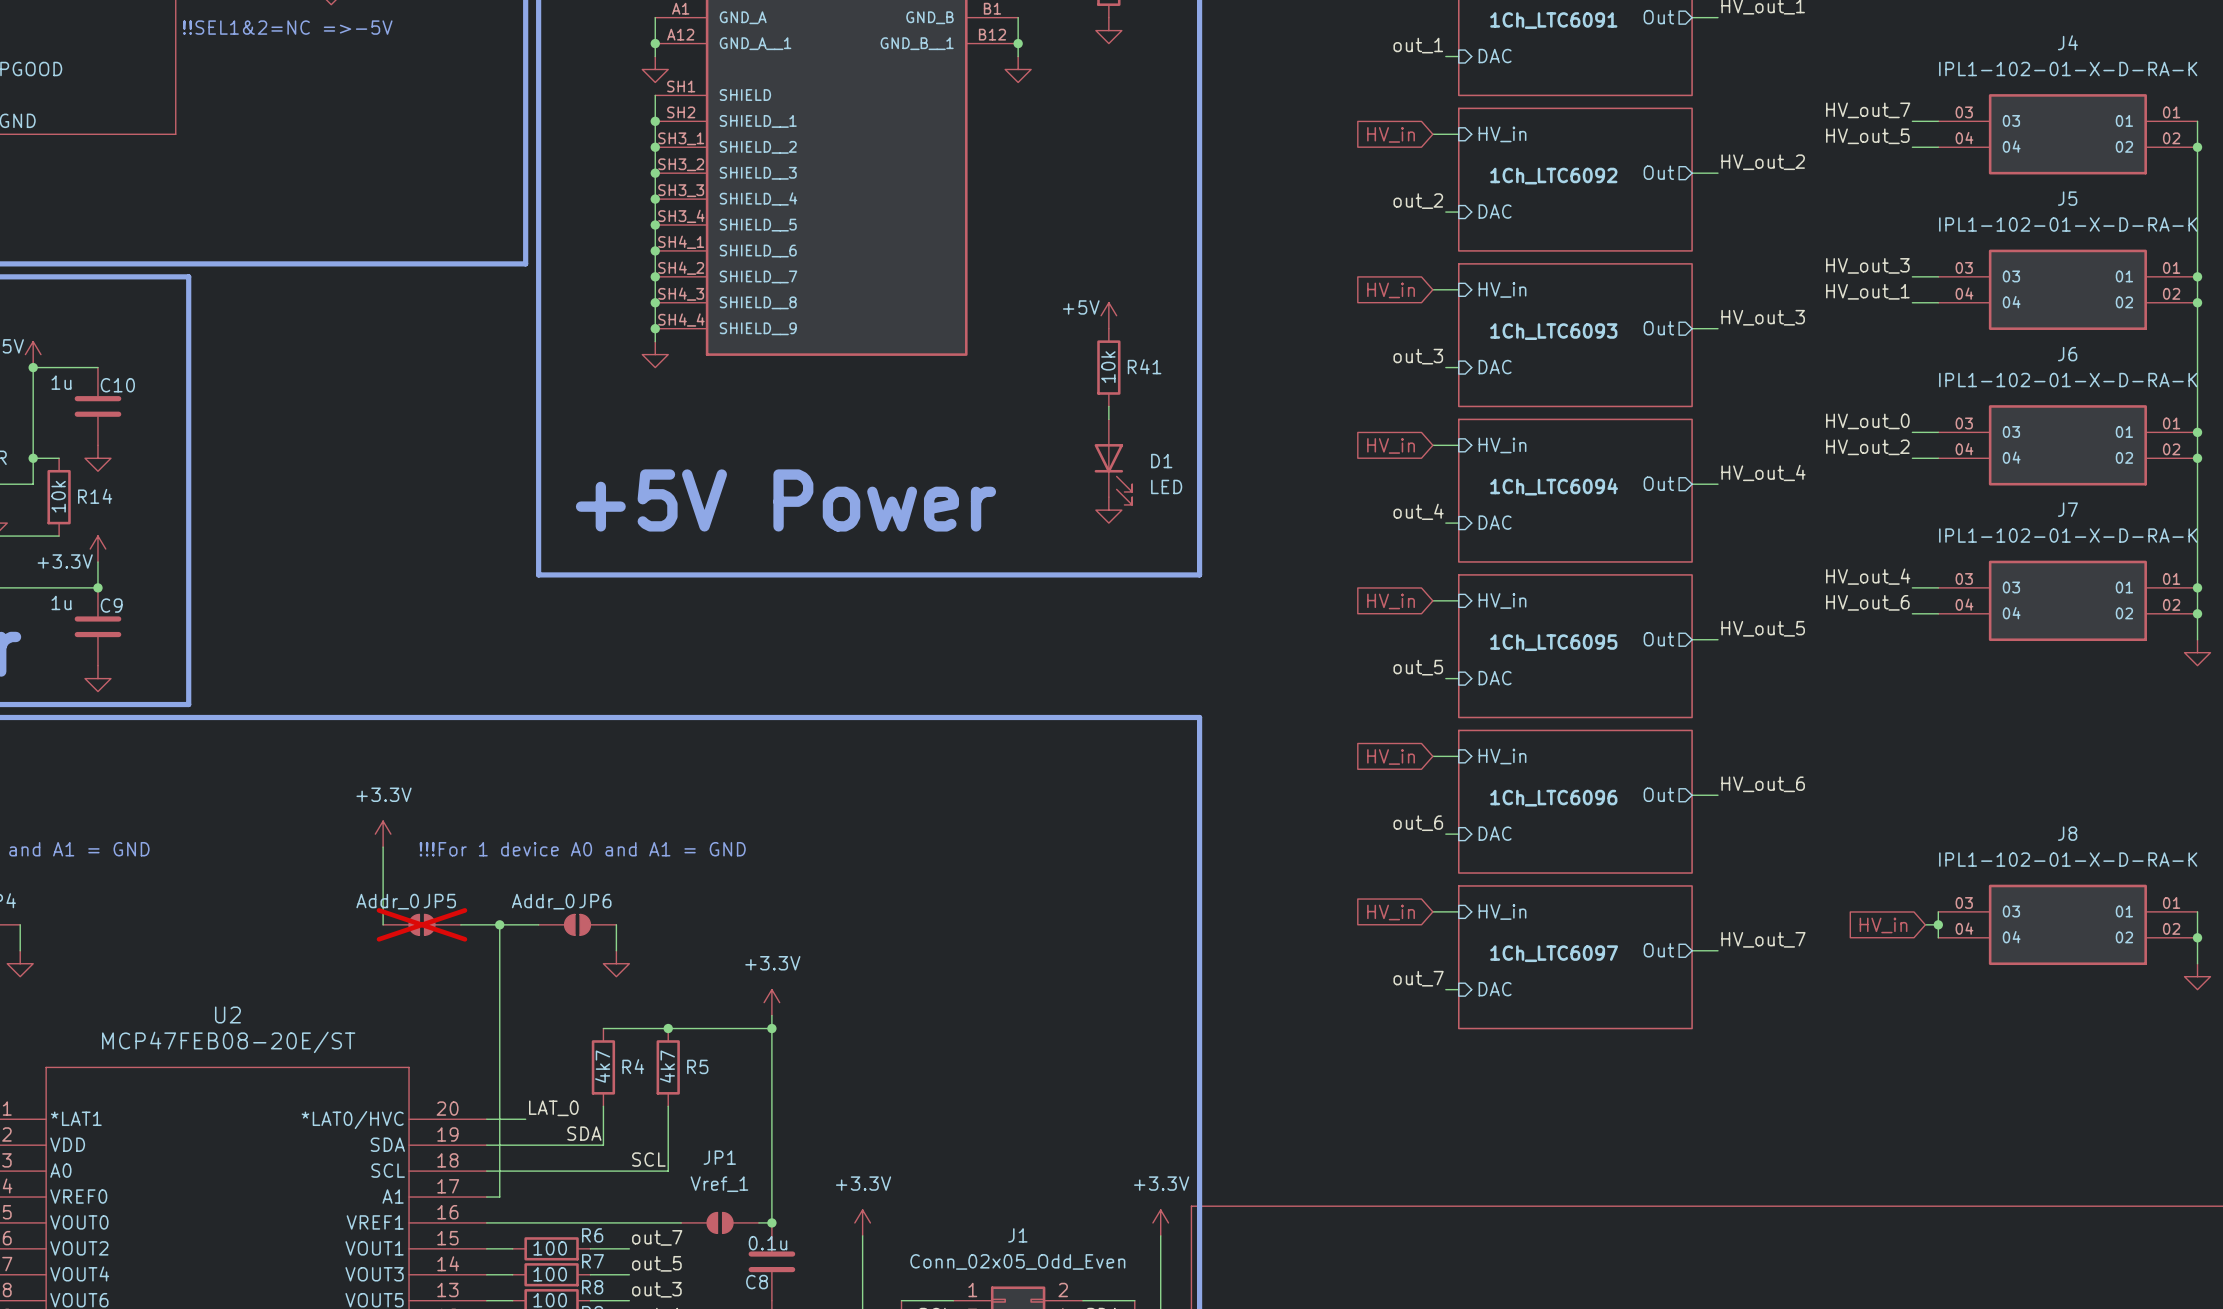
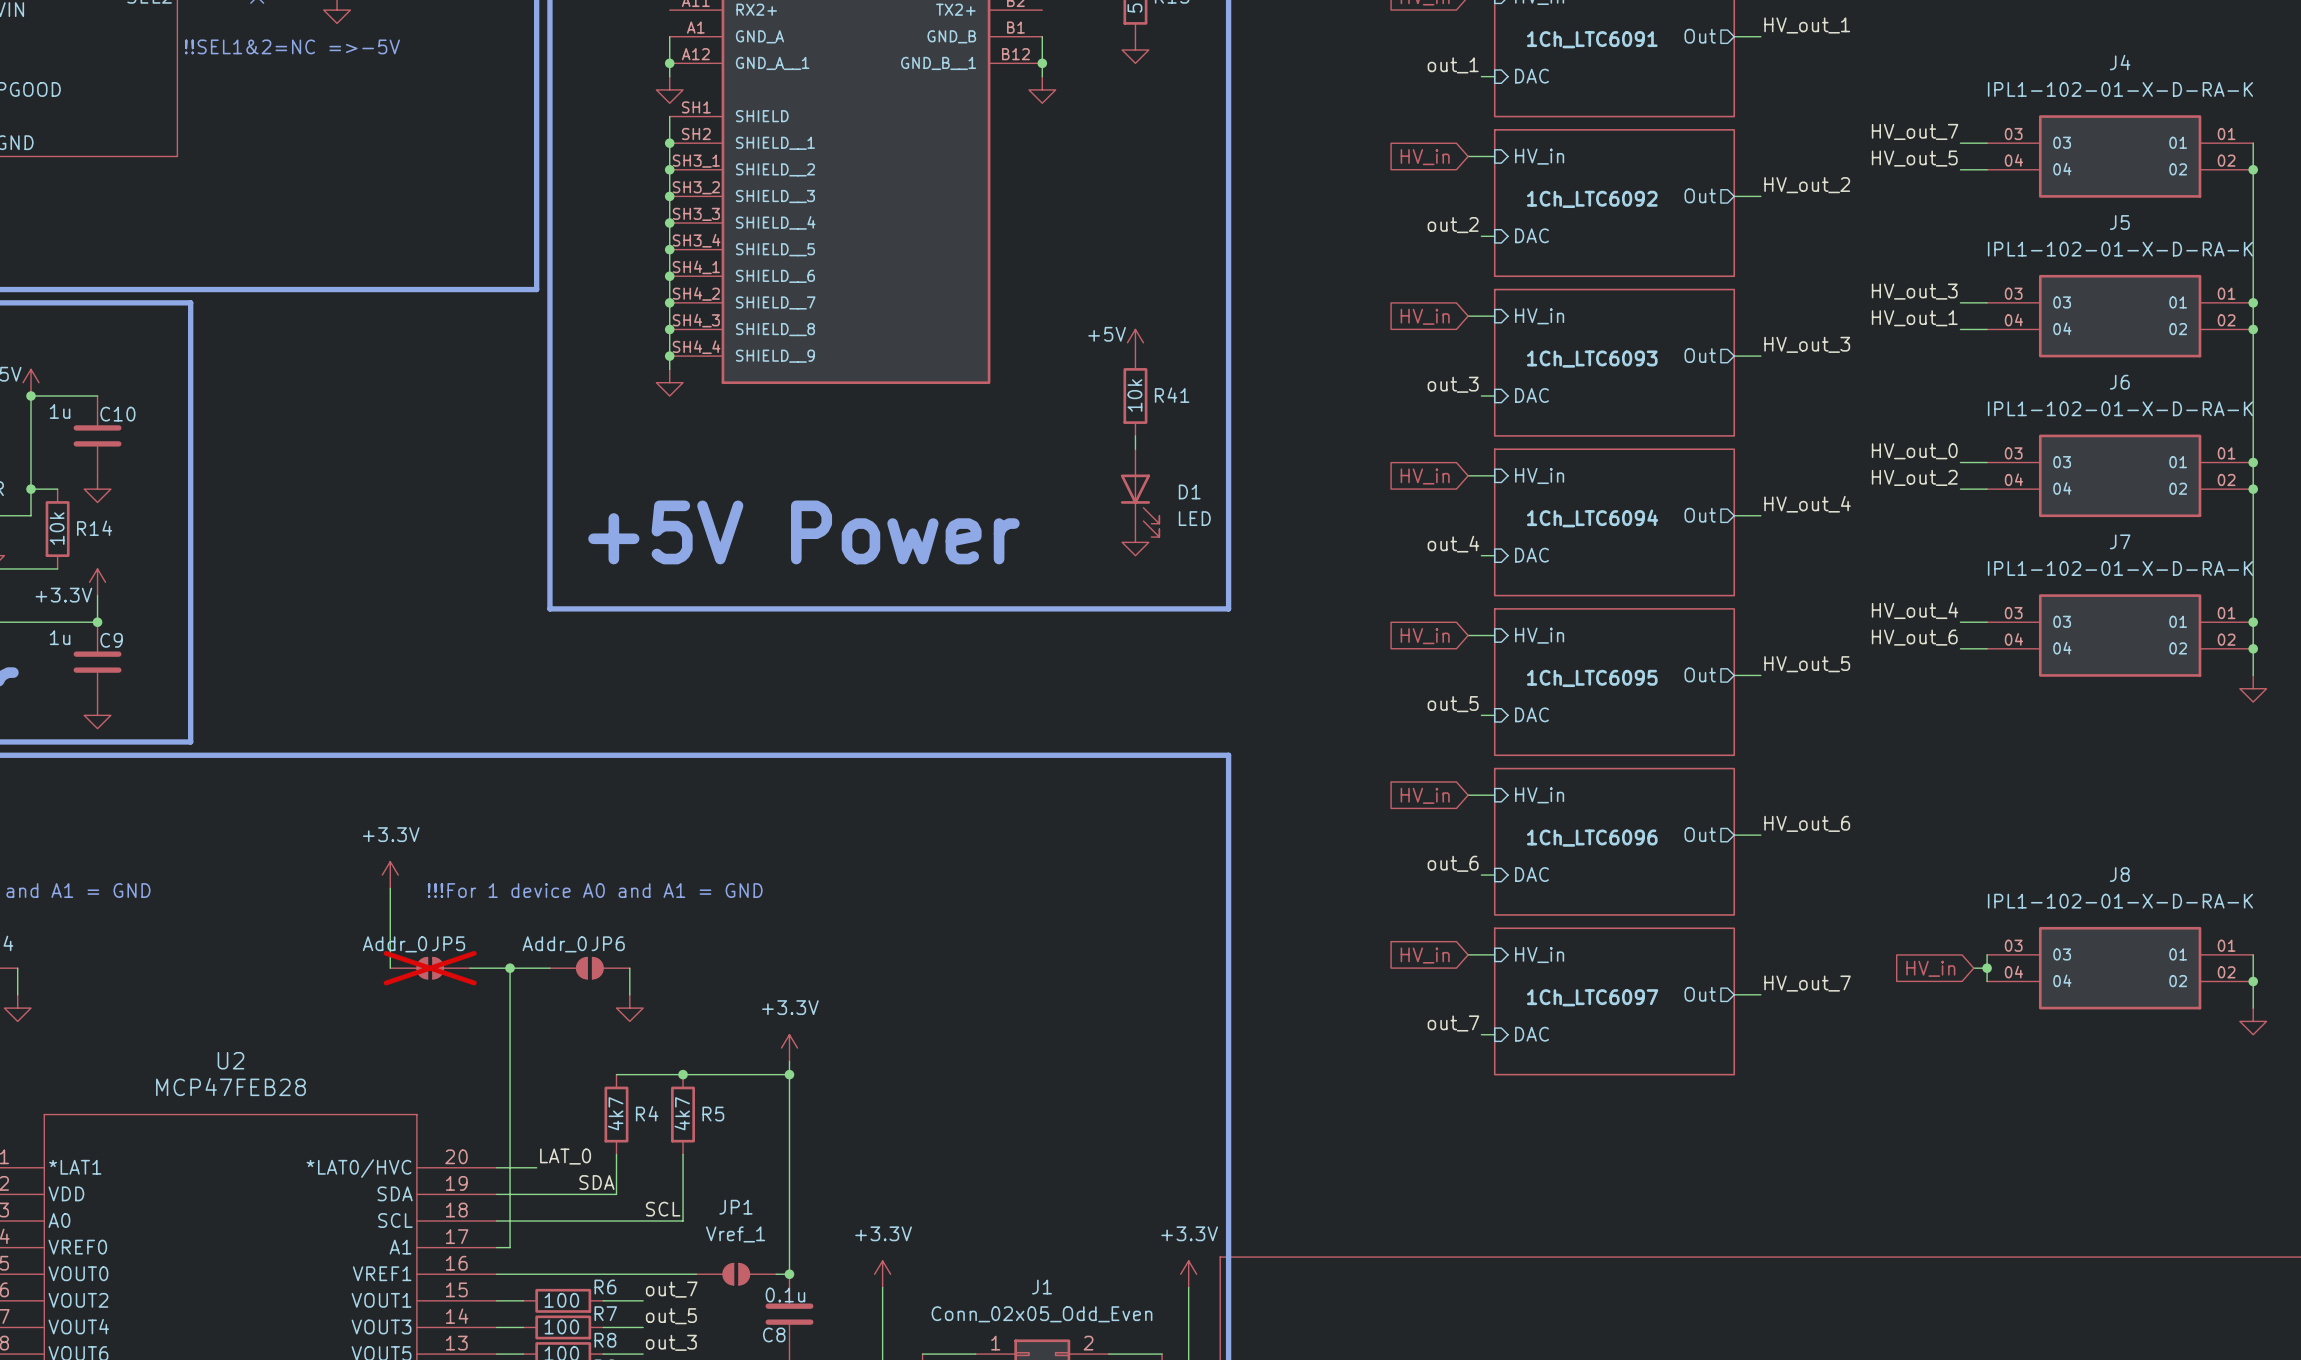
U2 value: MCP47FEB08-20E/ST (228, 1042) -> MCP47FEB28 (230, 1086)

